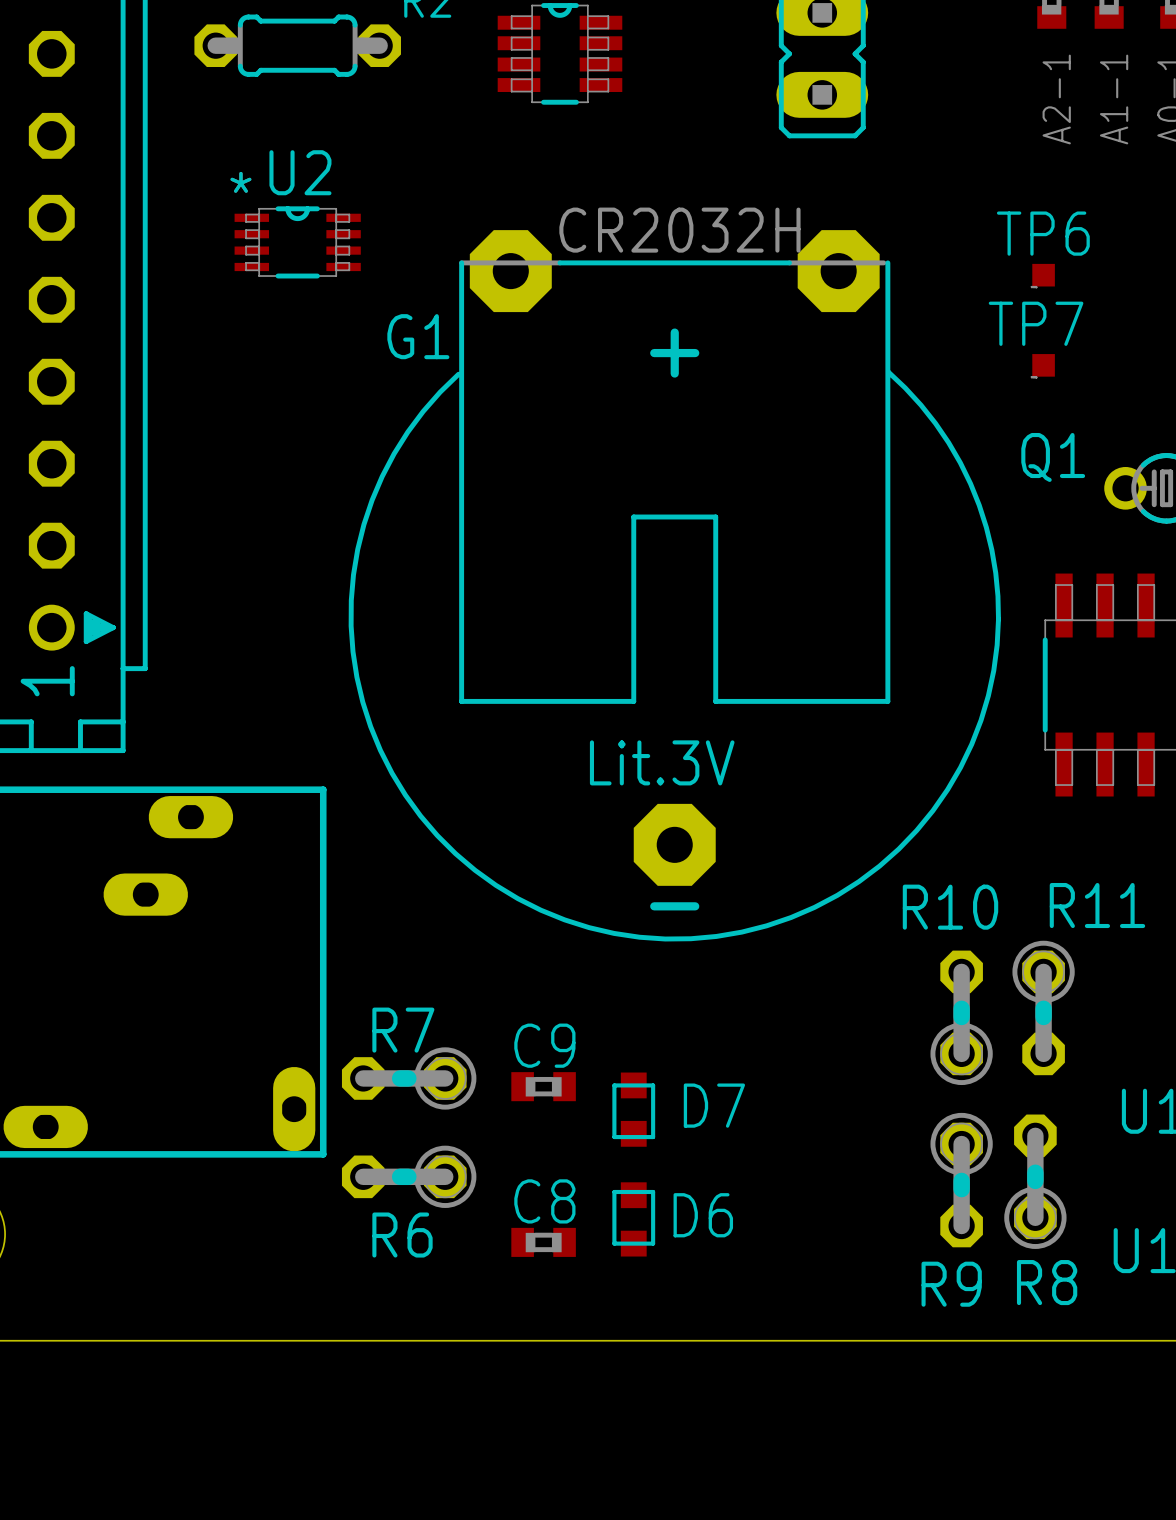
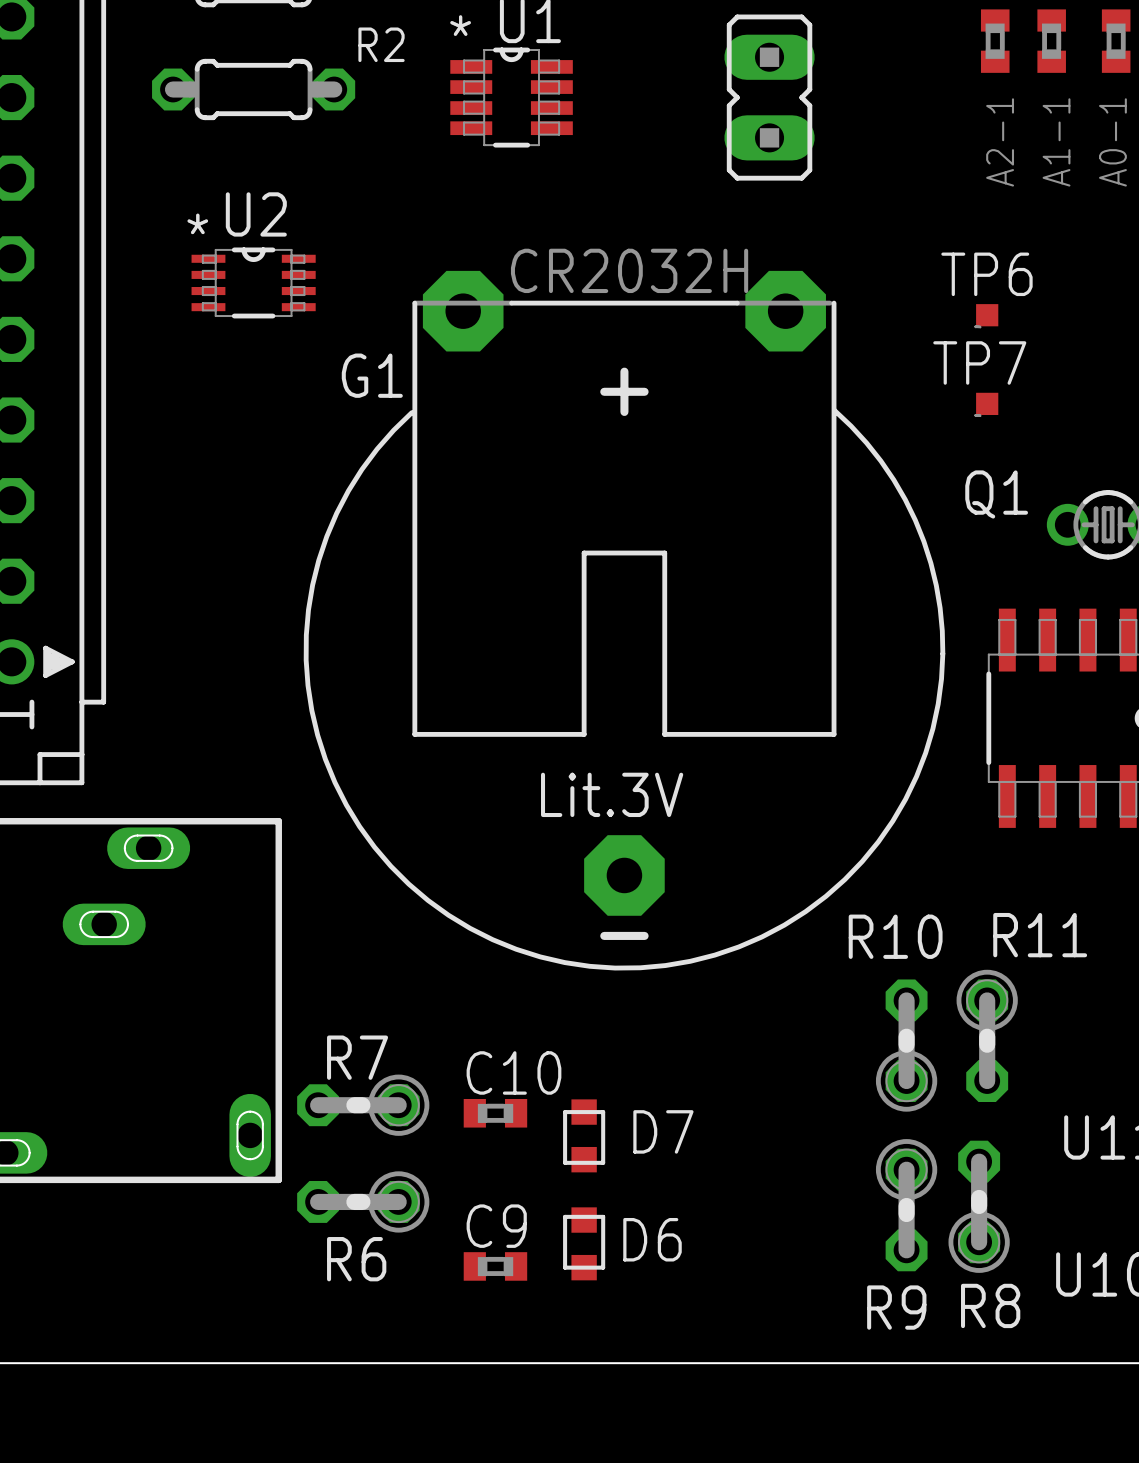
C9 name: C9 (544, 1045) -> C10 (513, 1072)
C8 name: C8 (544, 1201) -> C9 (496, 1226)

